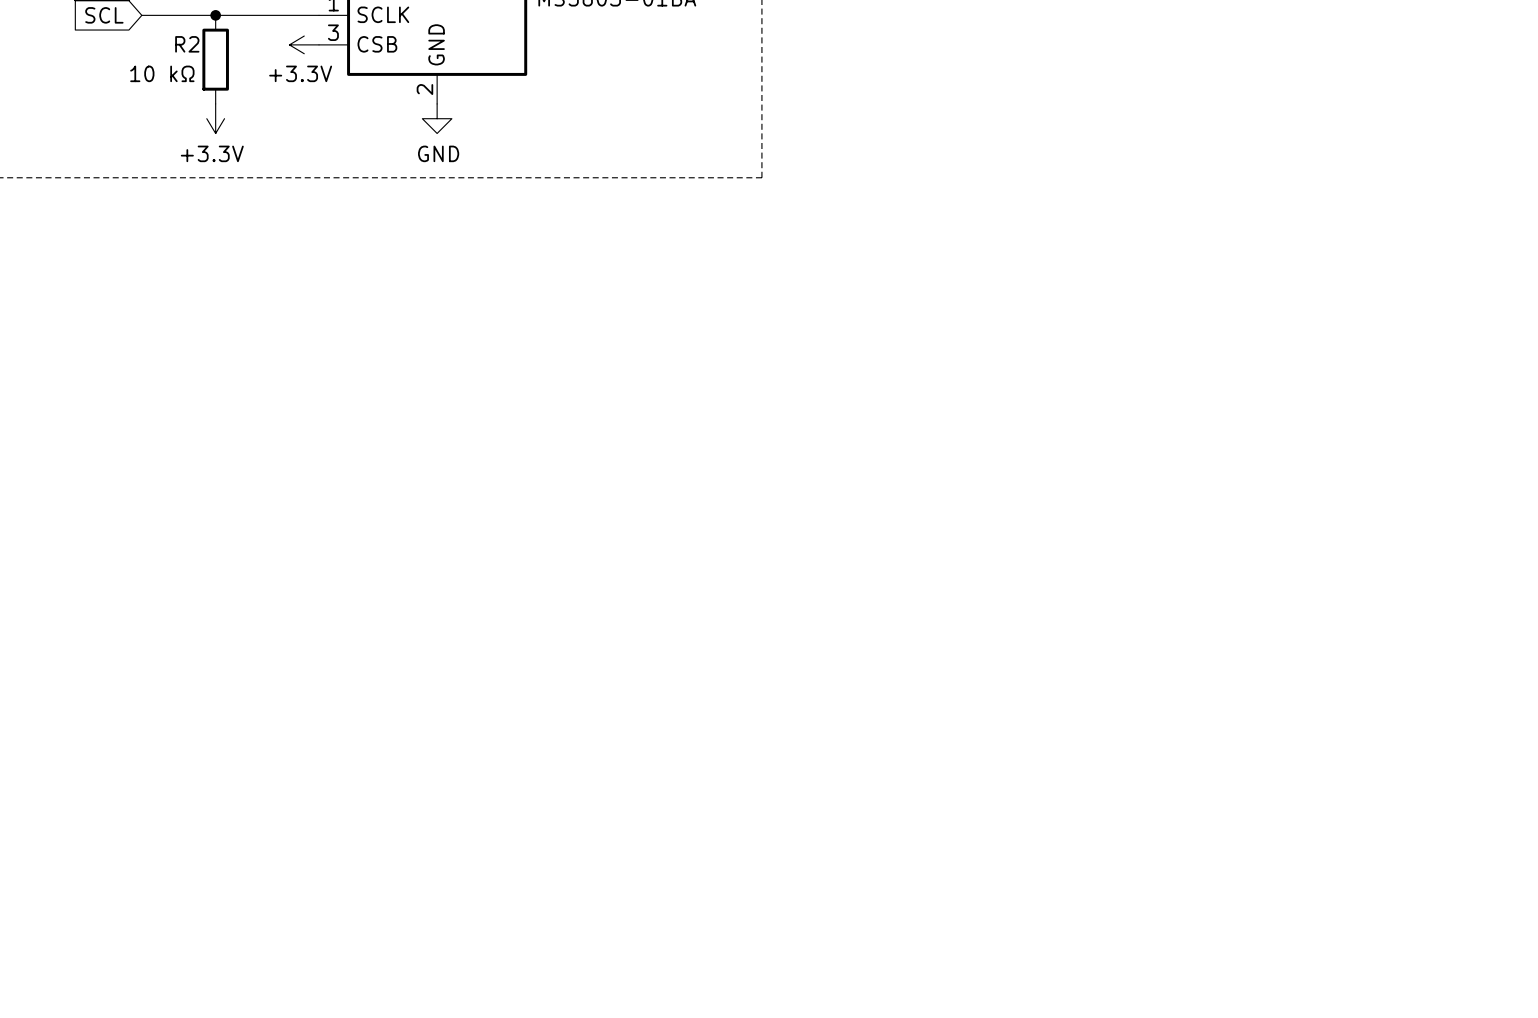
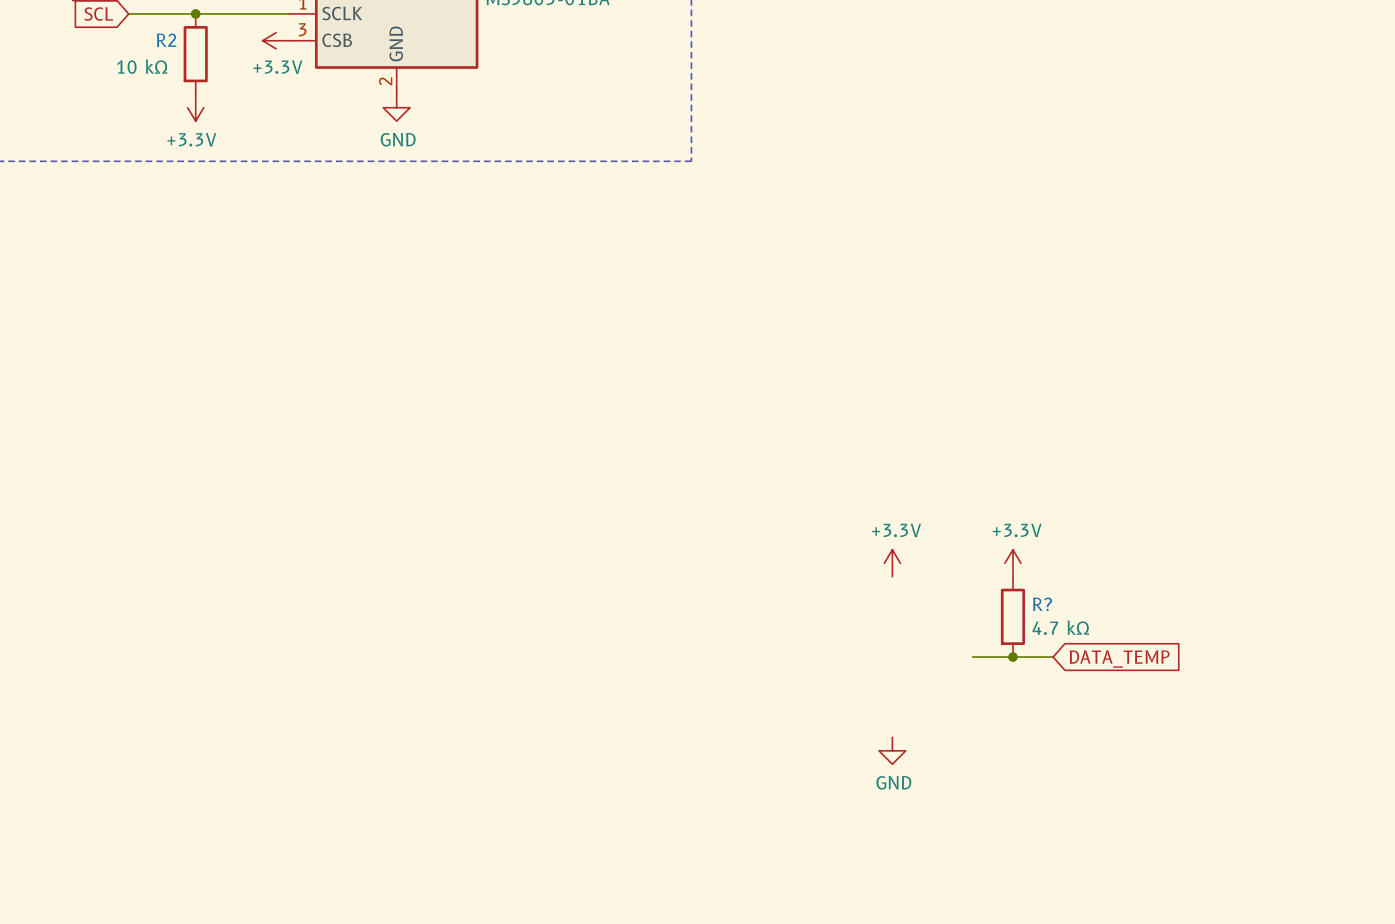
power symbol: none -> +3.3V (892, 563)
power symbol: none -> +3.3V (1012, 563)
R?: none -> 4.7 kΩ (1012, 616)
wire: none -> (972, 657) (1053, 657)
junction: none -> (1012, 657)
global label: none -> DATA_TEMP (1119, 659)
power symbol: none -> GND (892, 750)

